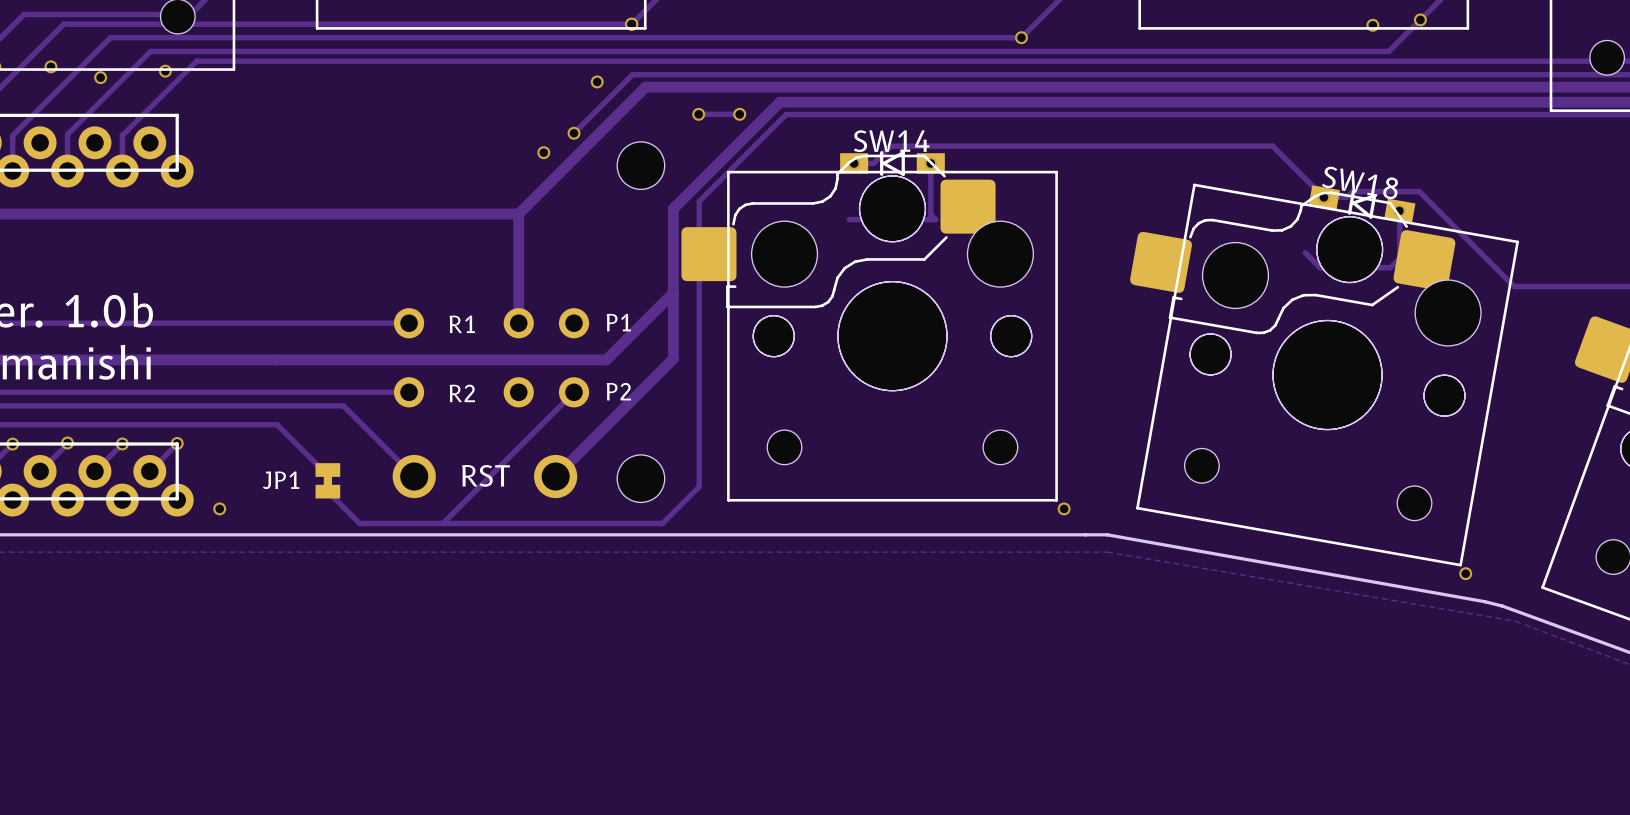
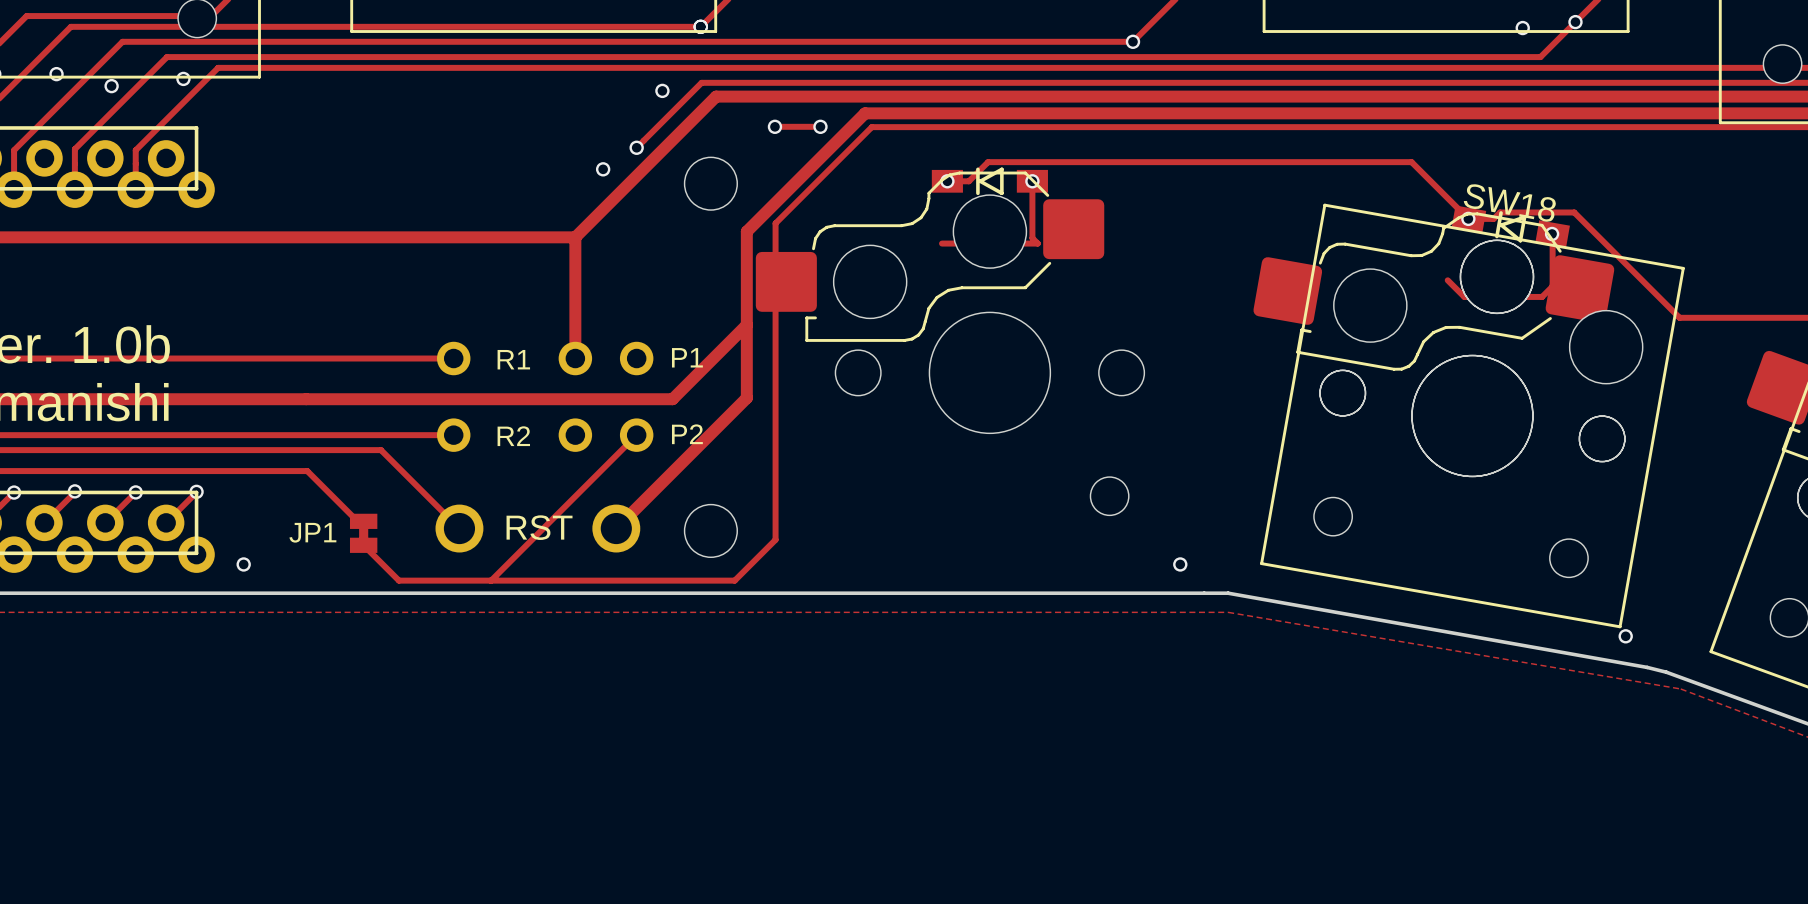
SW14: (892, 336) -> none

